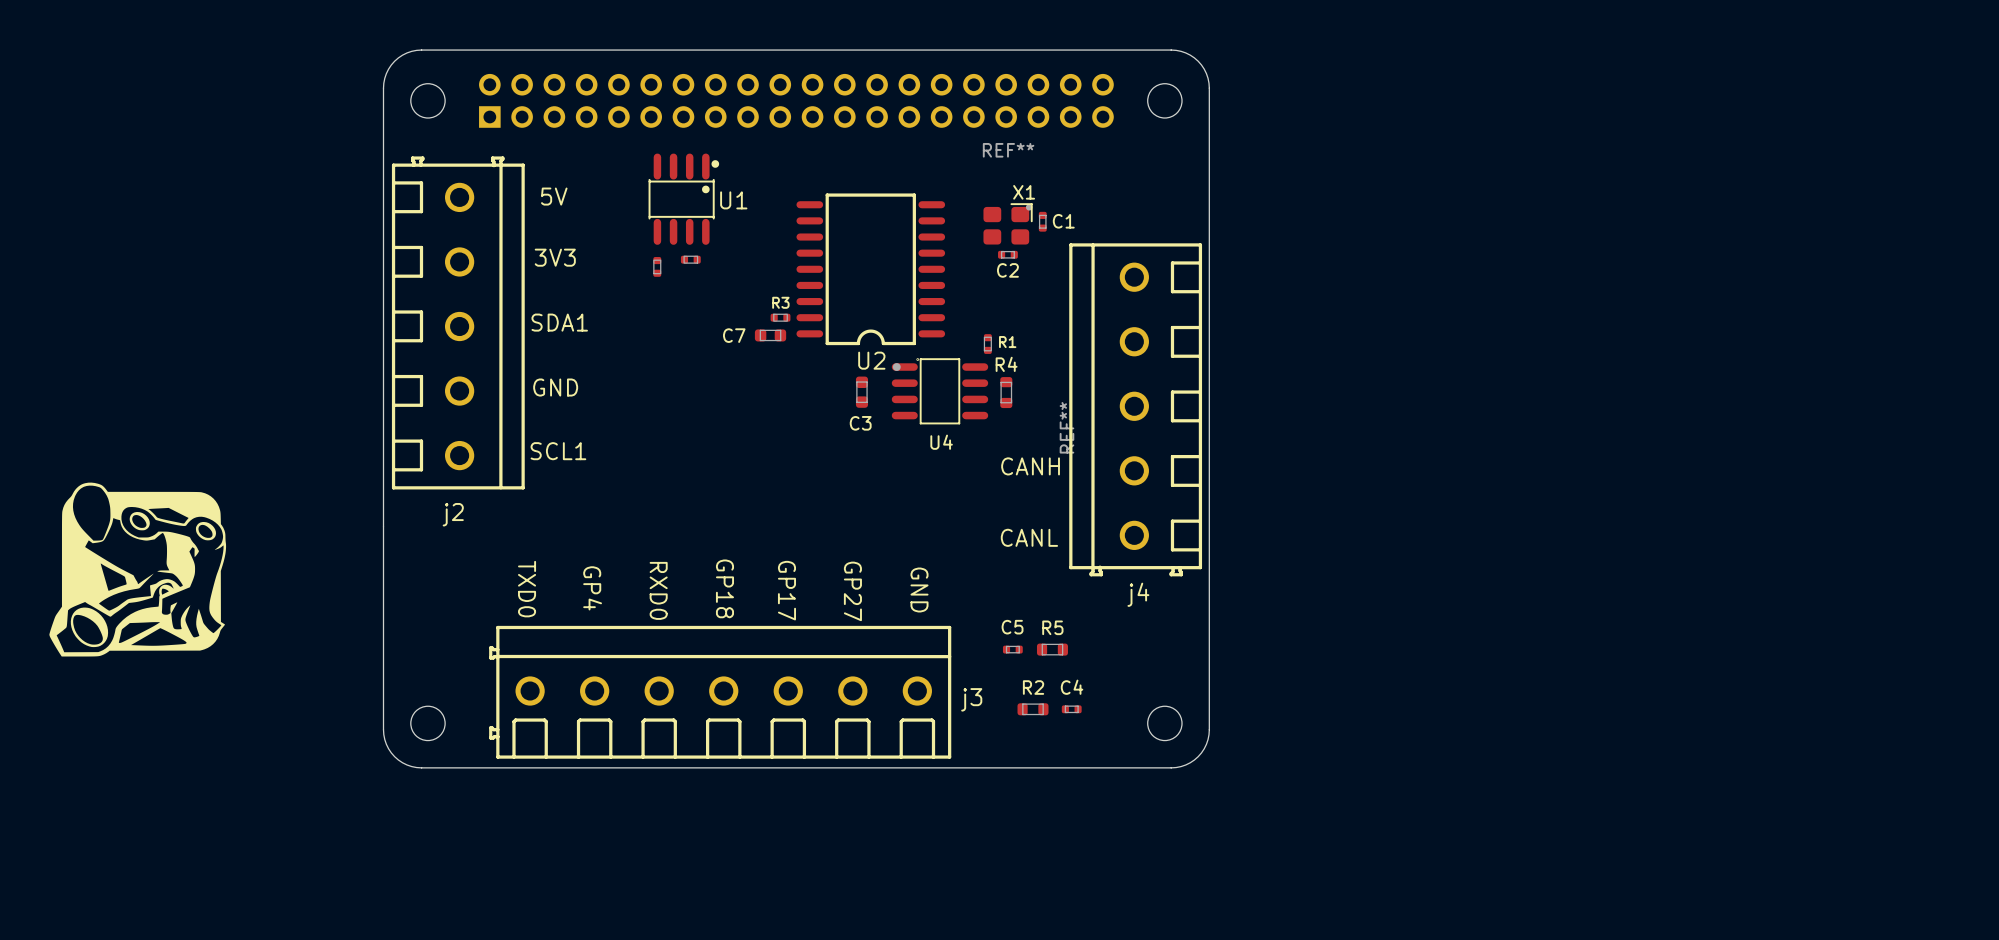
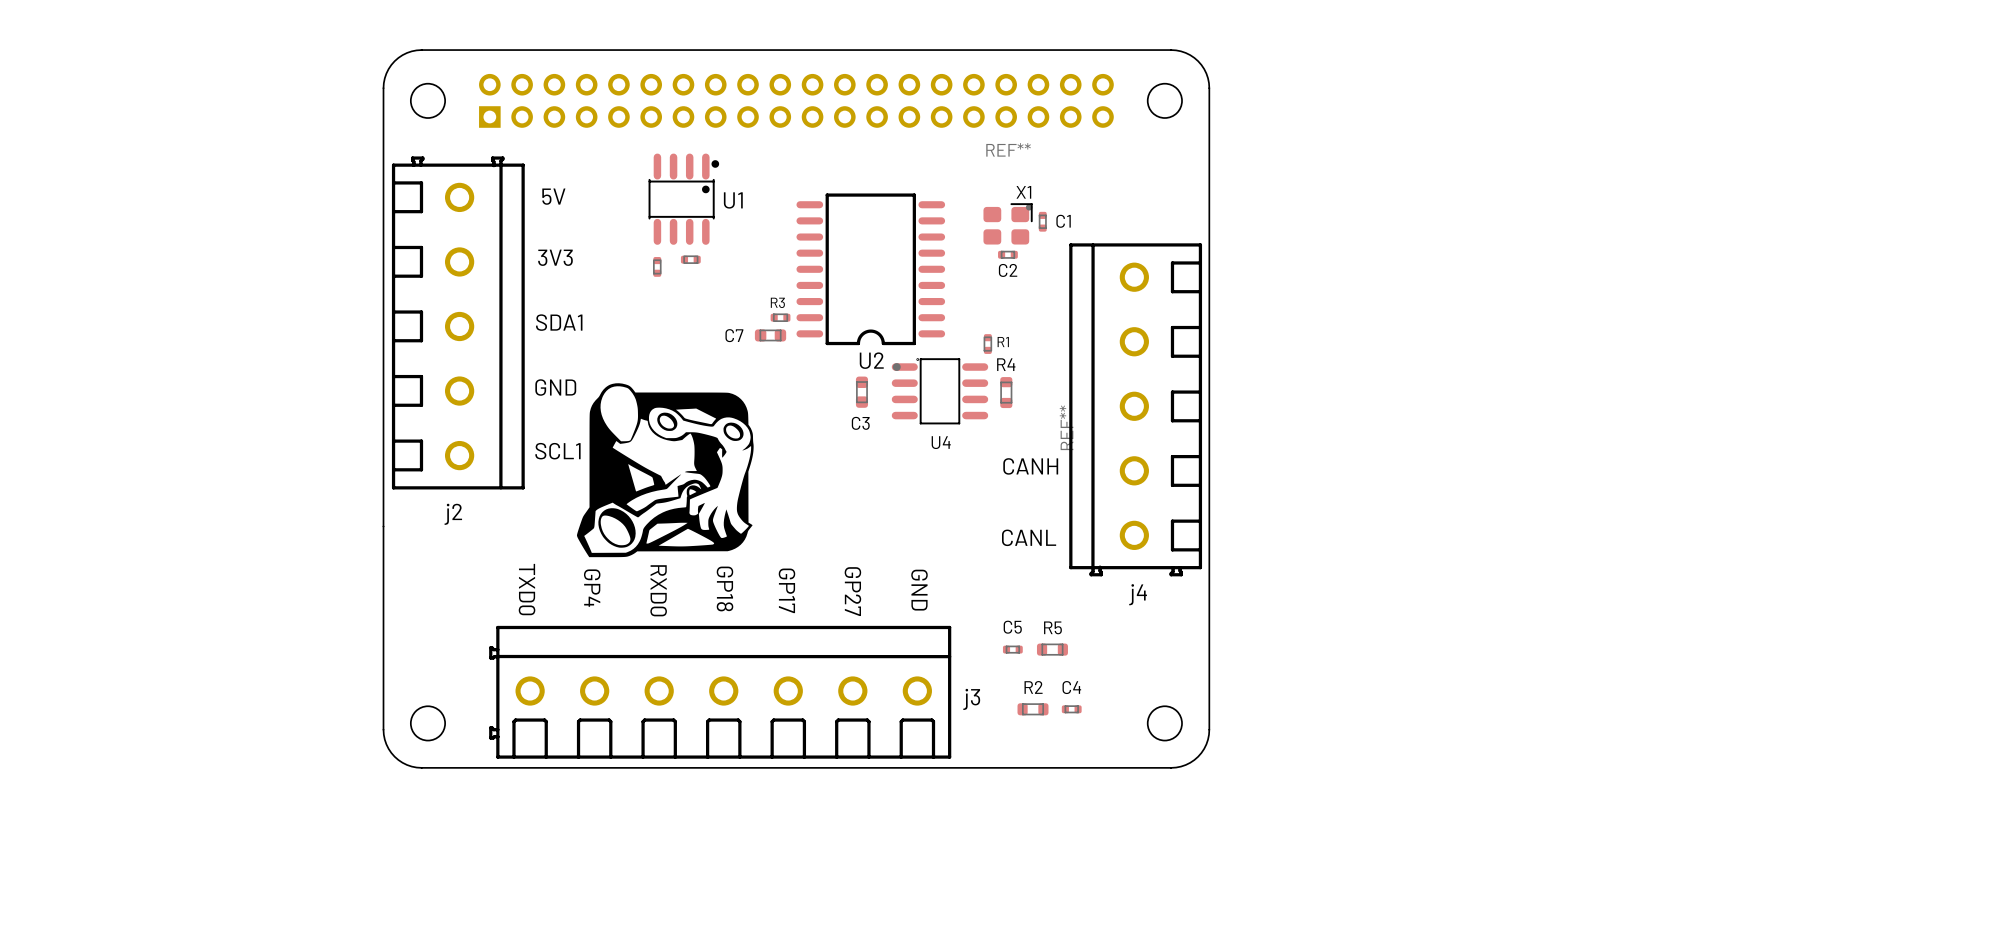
drawing: none -> [576, 383, 754, 558]
drawing: [49, 482, 227, 657] -> none

